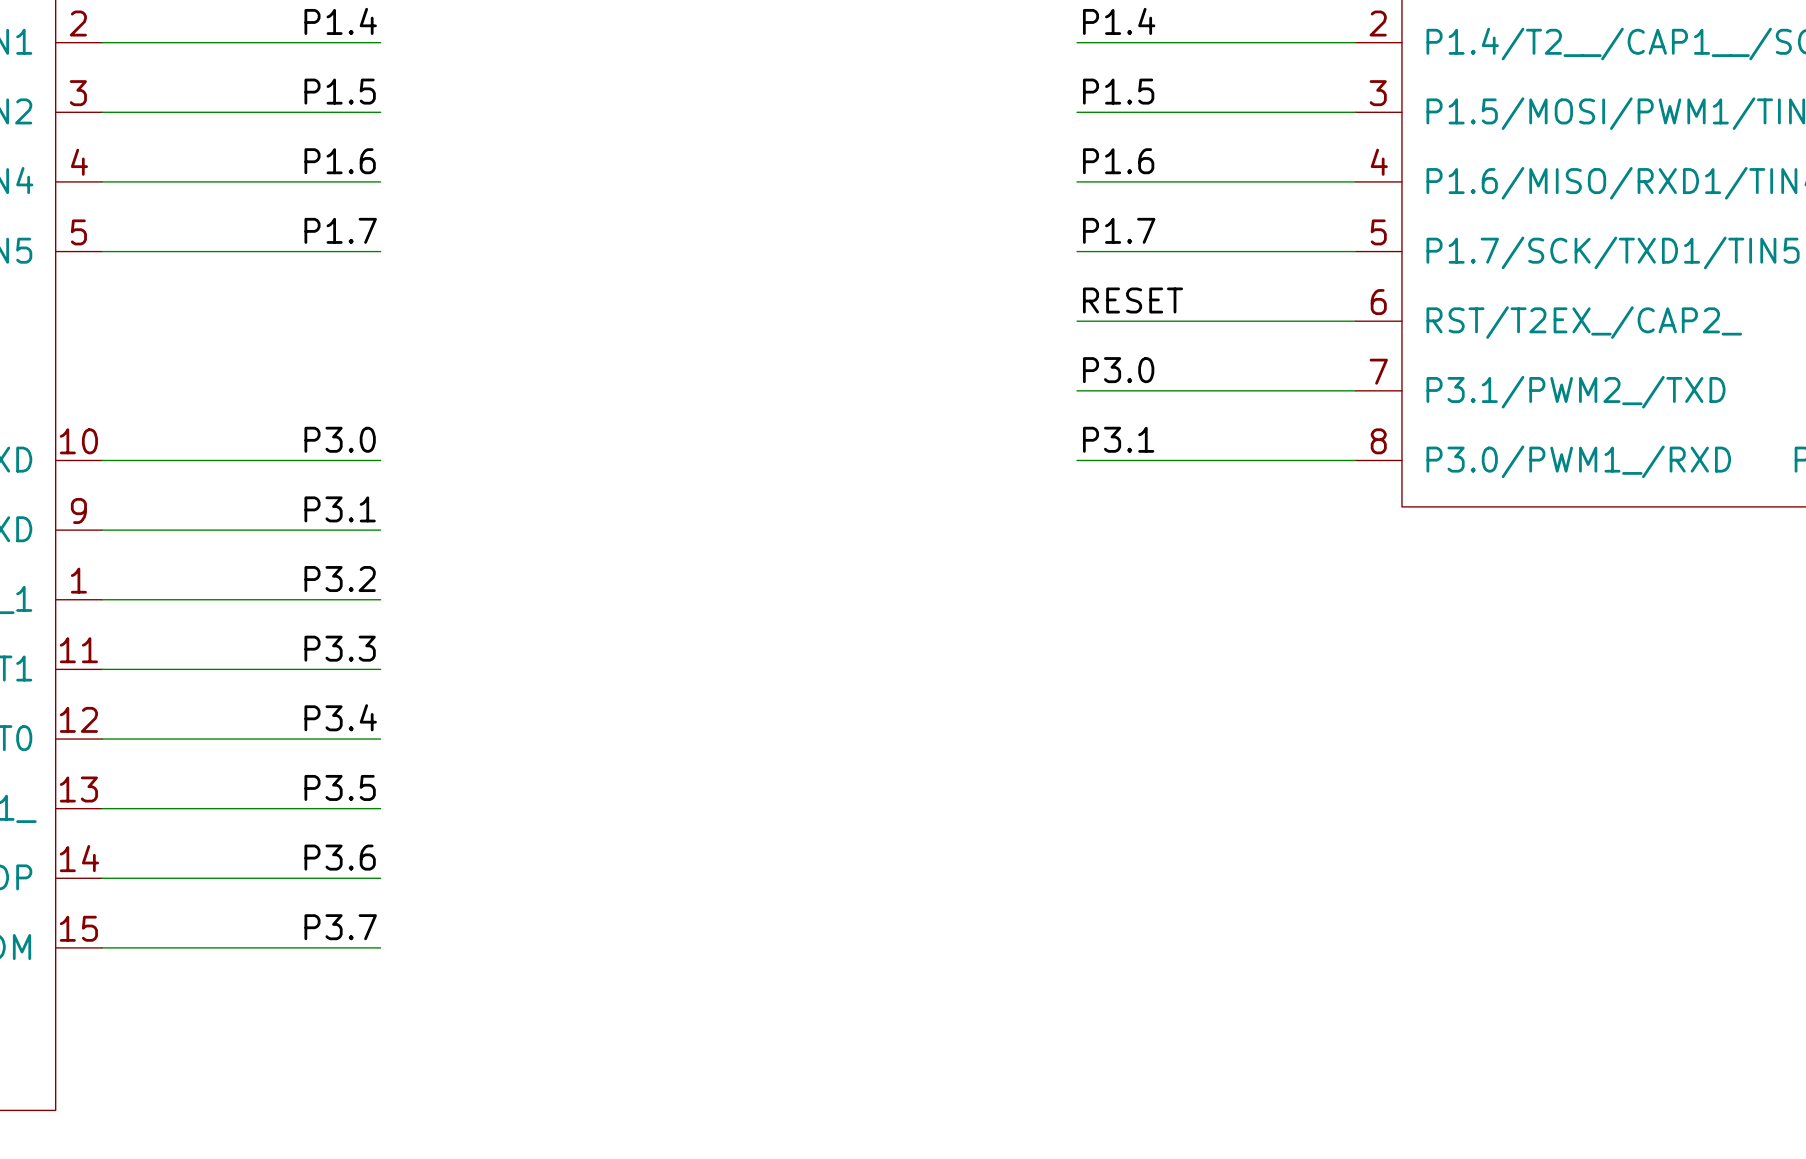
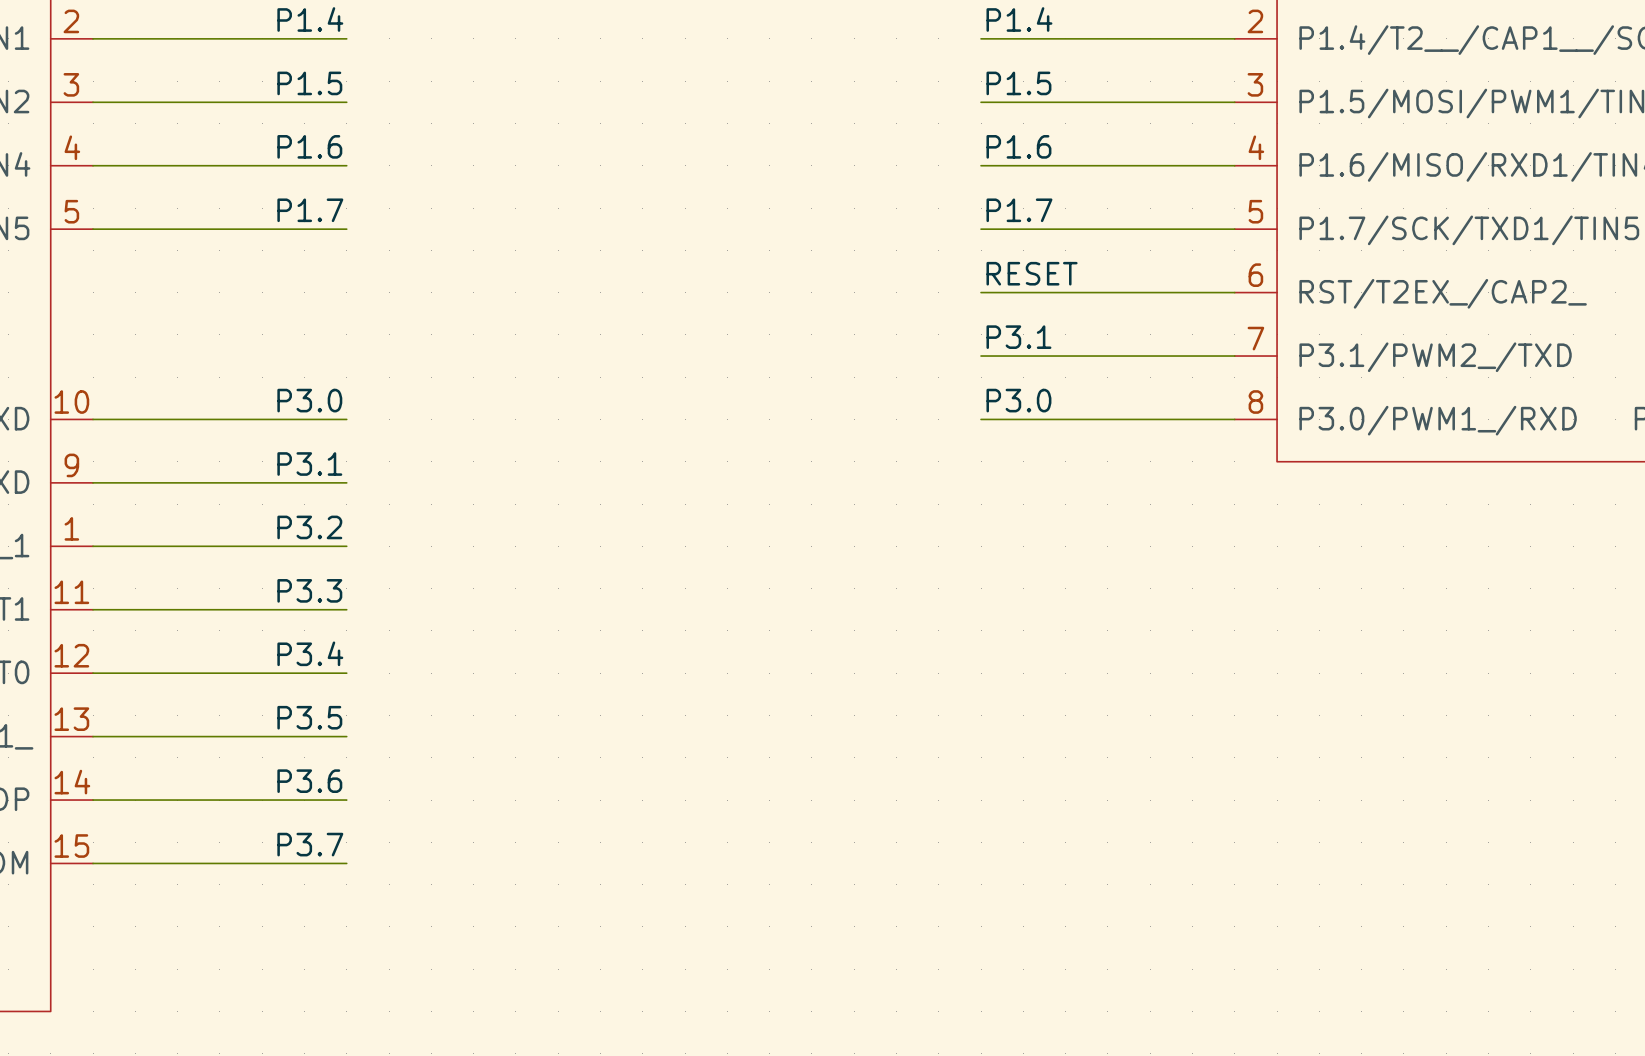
label: P3.0 (1118, 370) -> P3.1 (1018, 337)
label: P3.1 (1118, 439) -> P3.0 (1018, 400)

